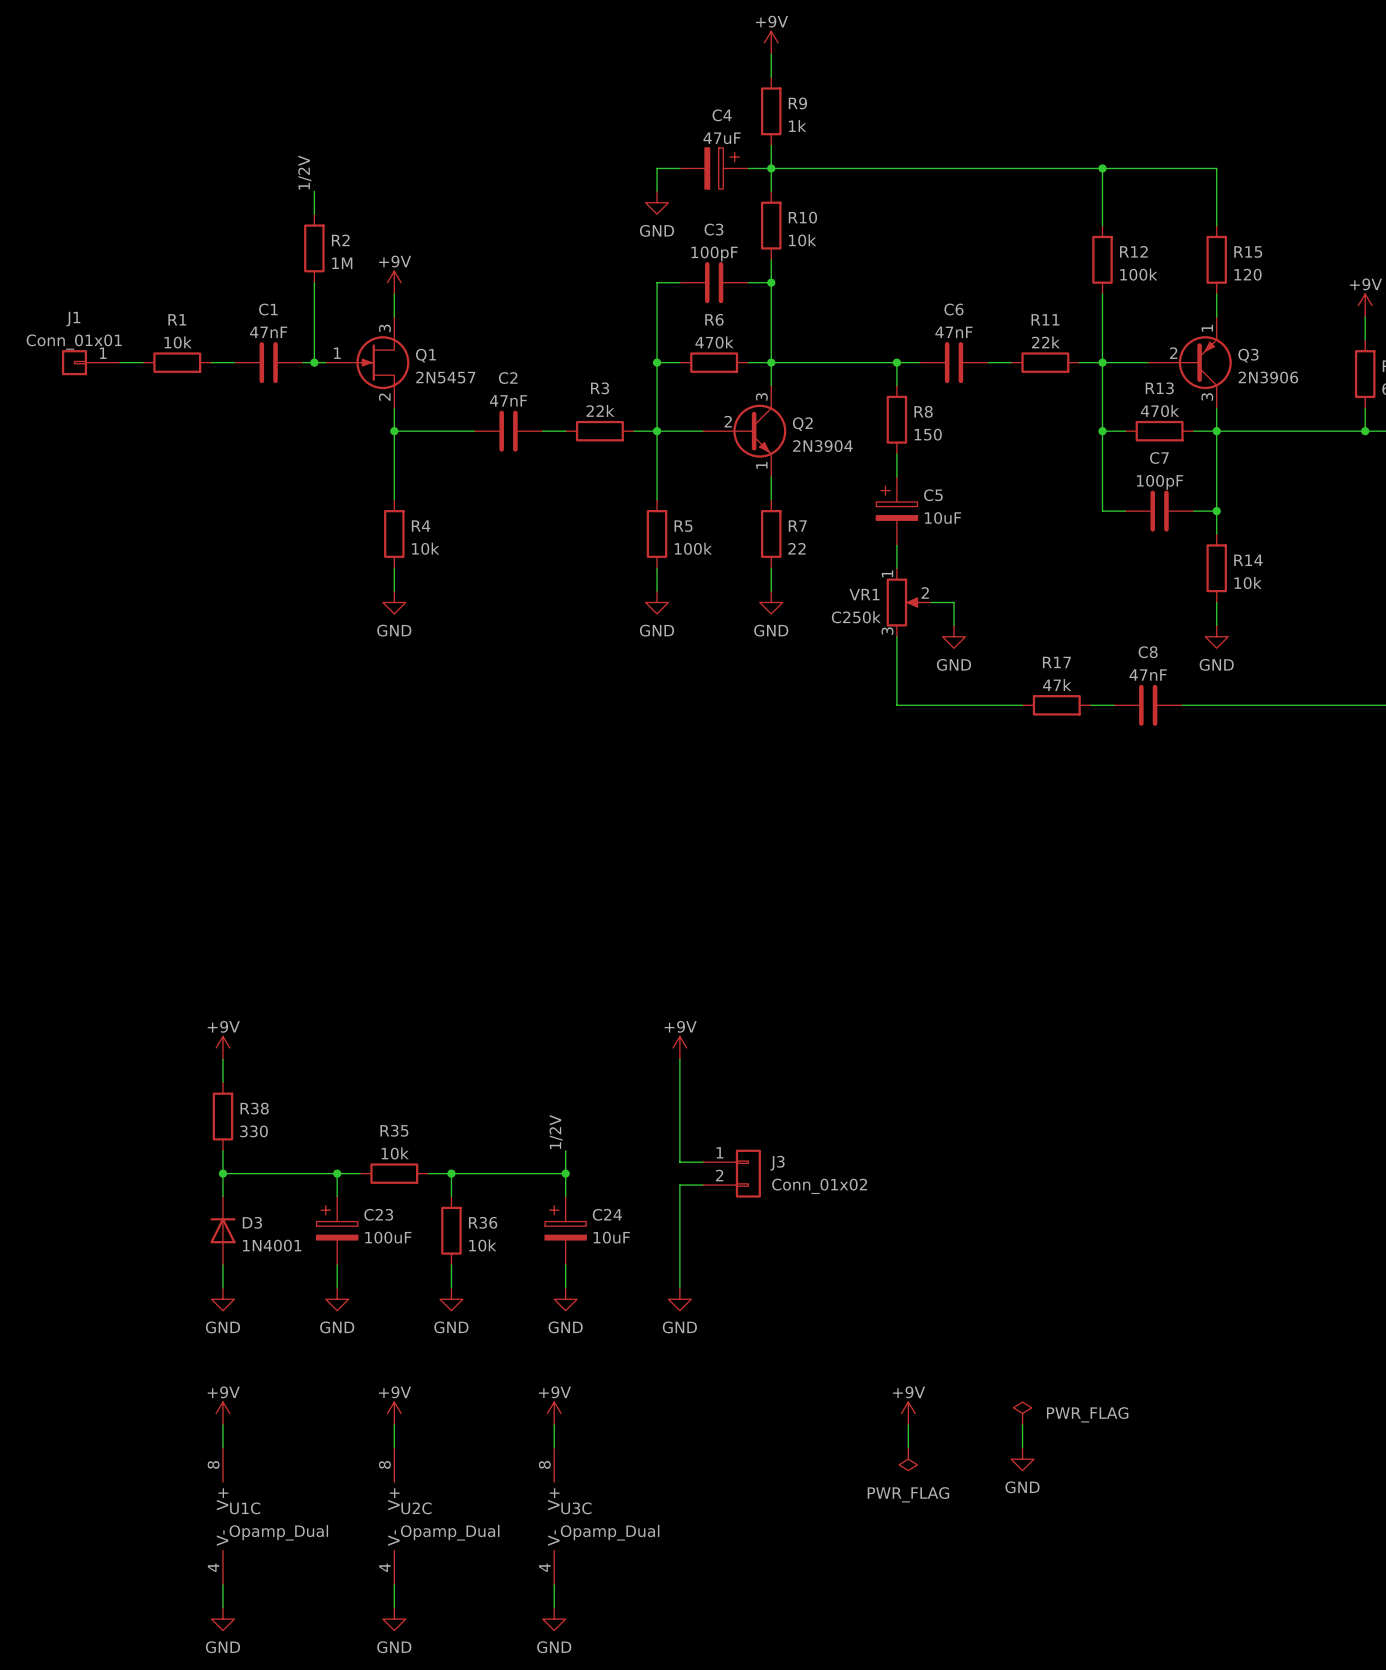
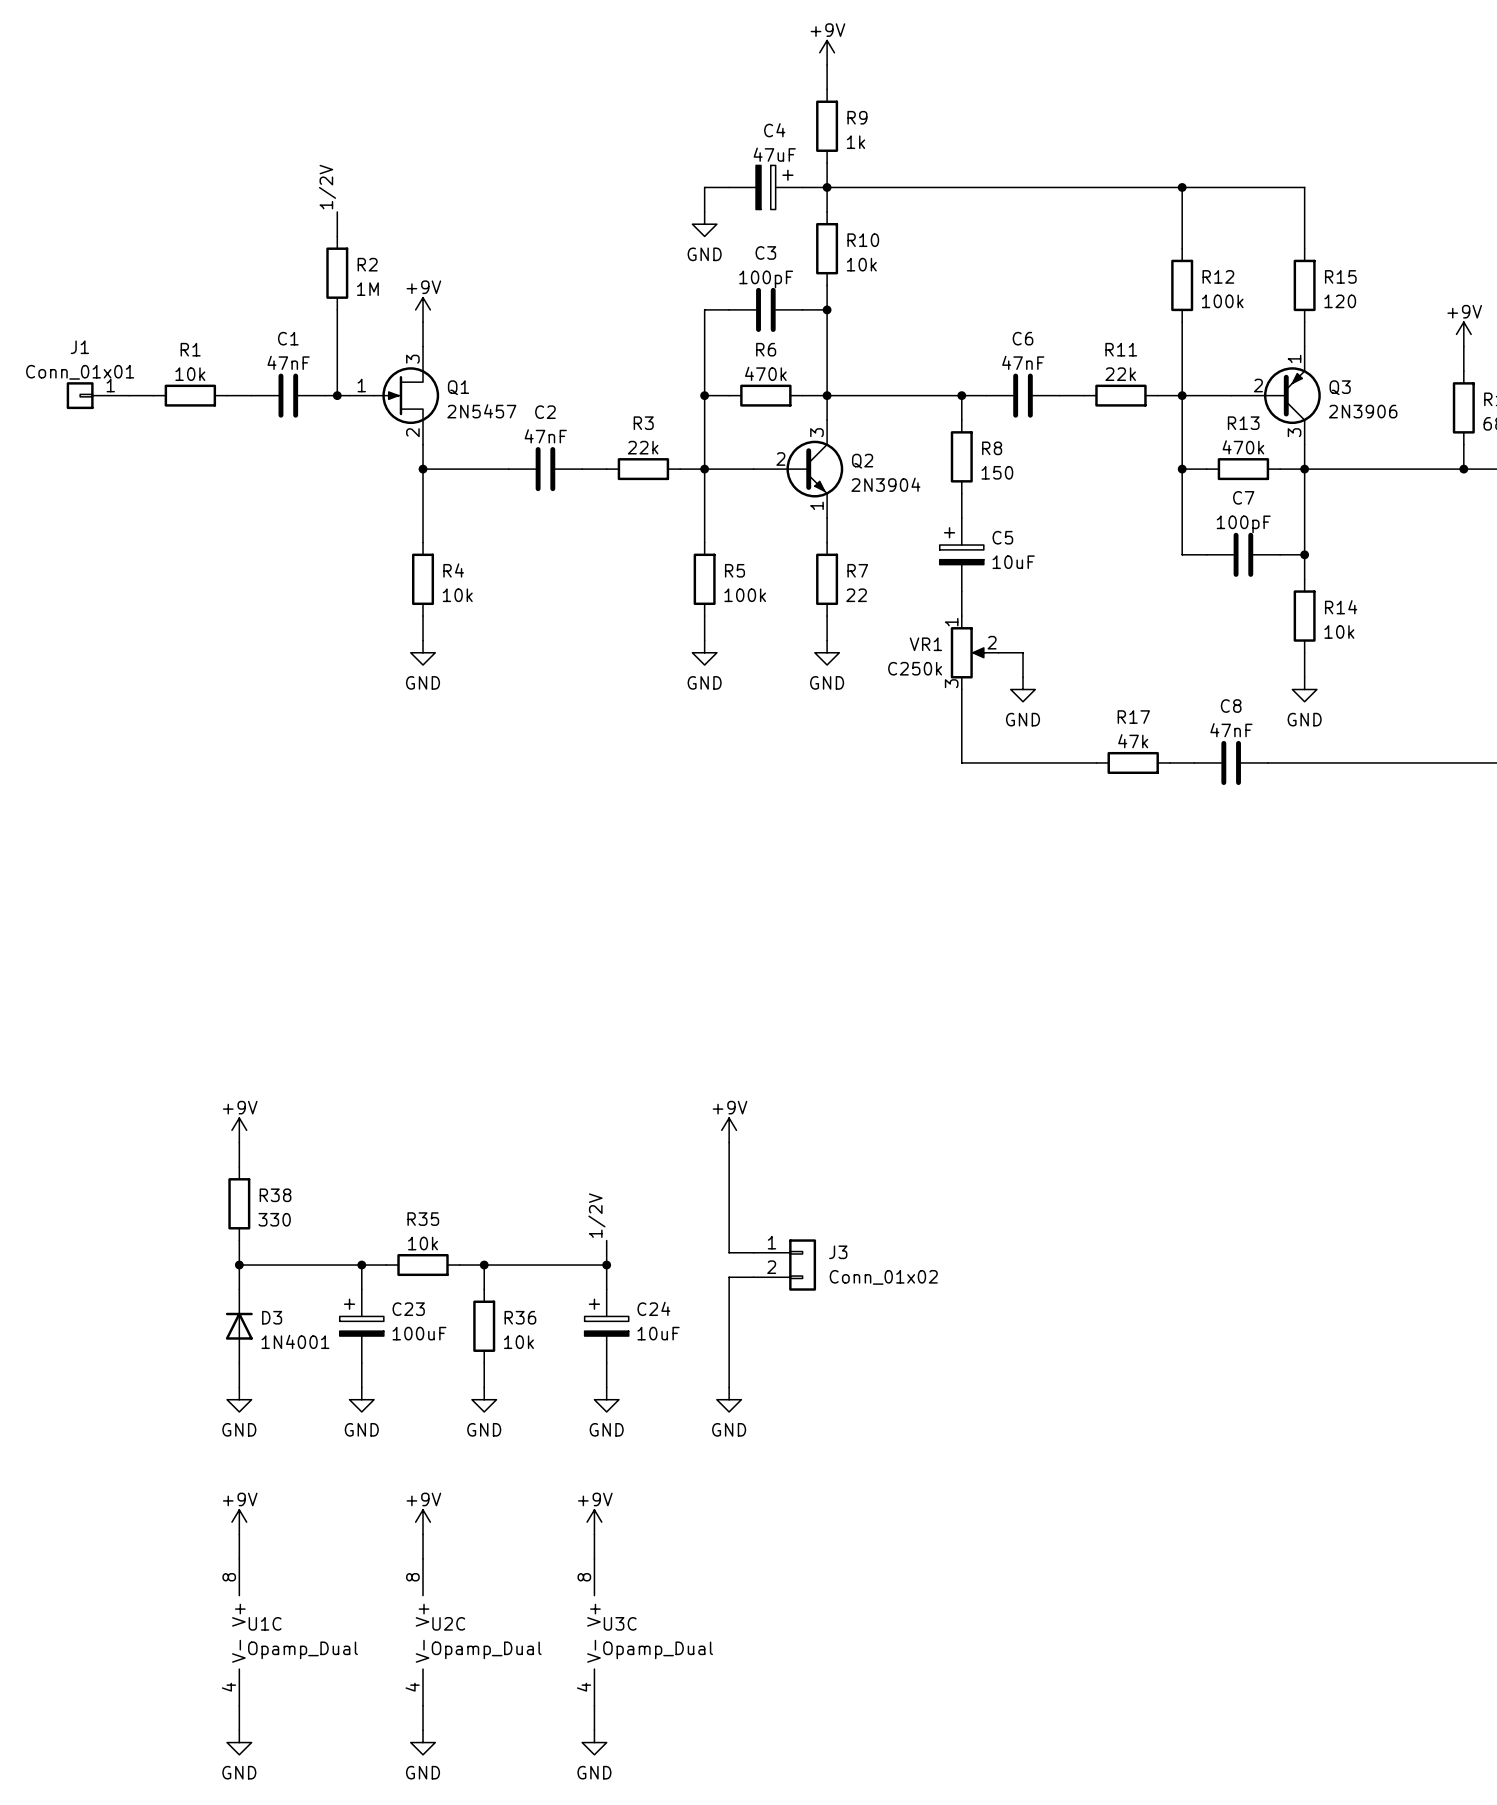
power symbol: +9V (908, 1413) -> none
power symbol: PWR_FLAG (1022, 1413) -> none
wire: (908, 1424) (908, 1447) -> none
wire: (1022, 1424) (1022, 1447) -> none
power symbol: PWR_FLAG (908, 1459) -> none
power symbol: GND (1022, 1459) -> none

